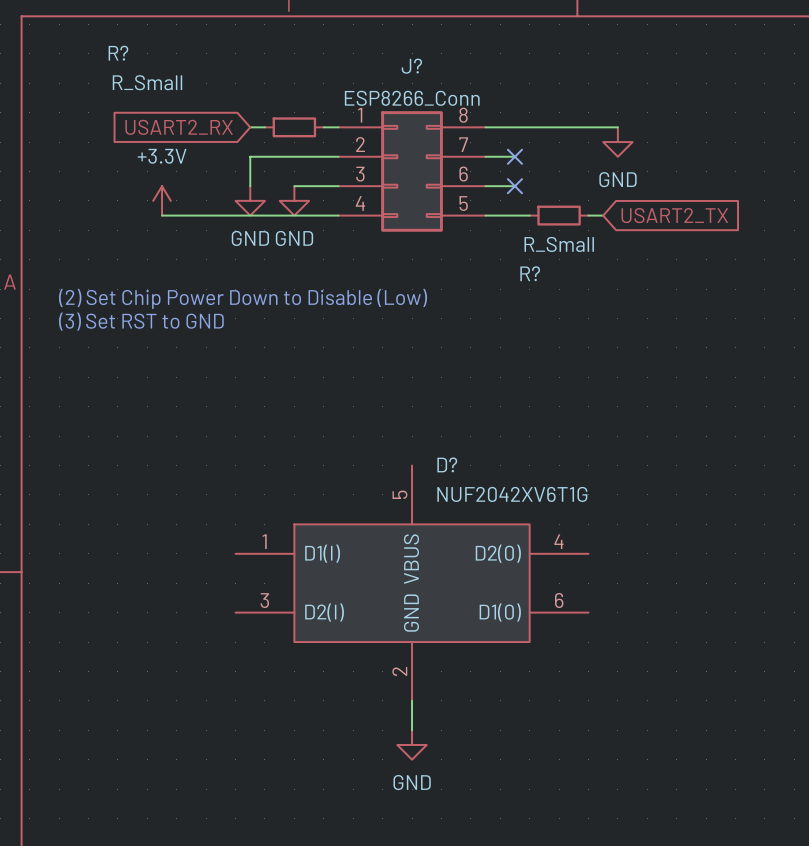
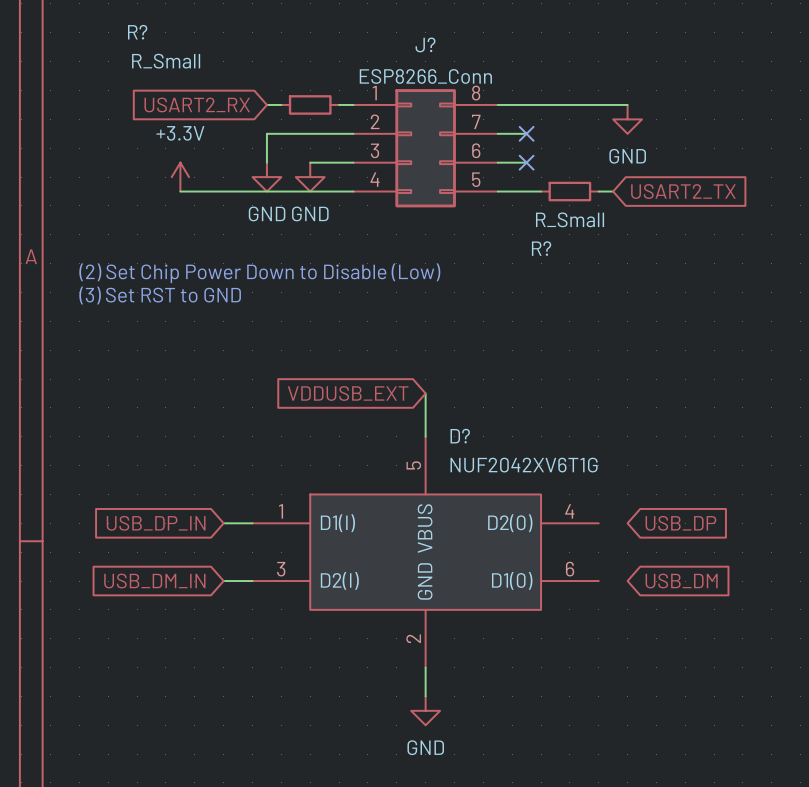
global label: none -> VDDUSB_EXT (348, 393)
wire: none -> (425, 393) (425, 436)
global label: none -> USB_DP_IN (156, 523)
wire: none -> (223, 523) (252, 523)
global label: none -> USB_DP (680, 523)
global label: none -> USB_DM_IN (154, 581)
wire: none -> (223, 581) (252, 581)
global label: none -> USB_DM (681, 581)

